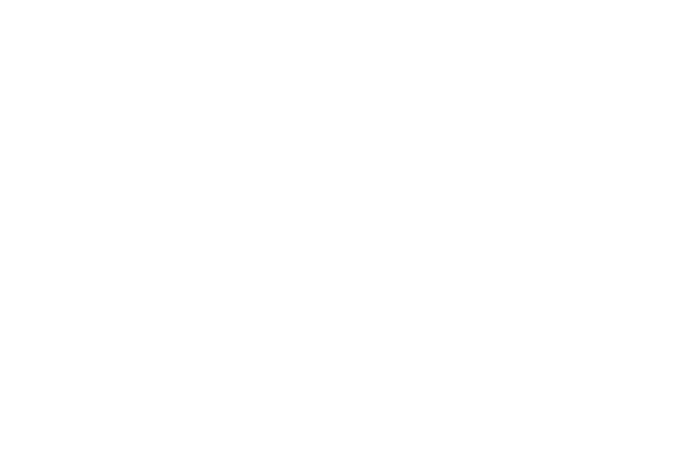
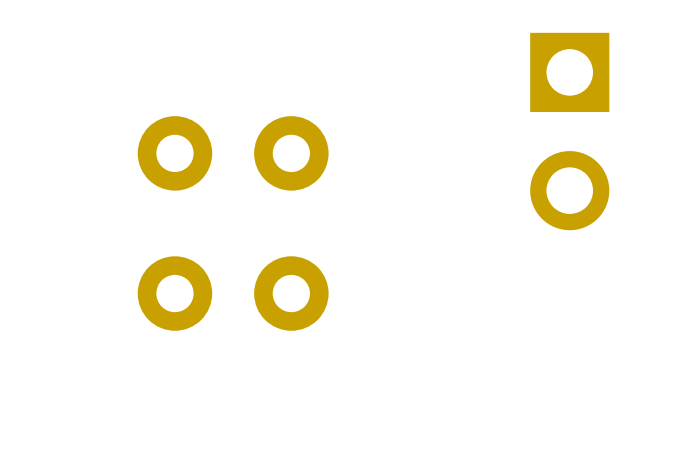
part: none -> (569, 131)
part: none -> (233, 153)
part: none -> (233, 293)

